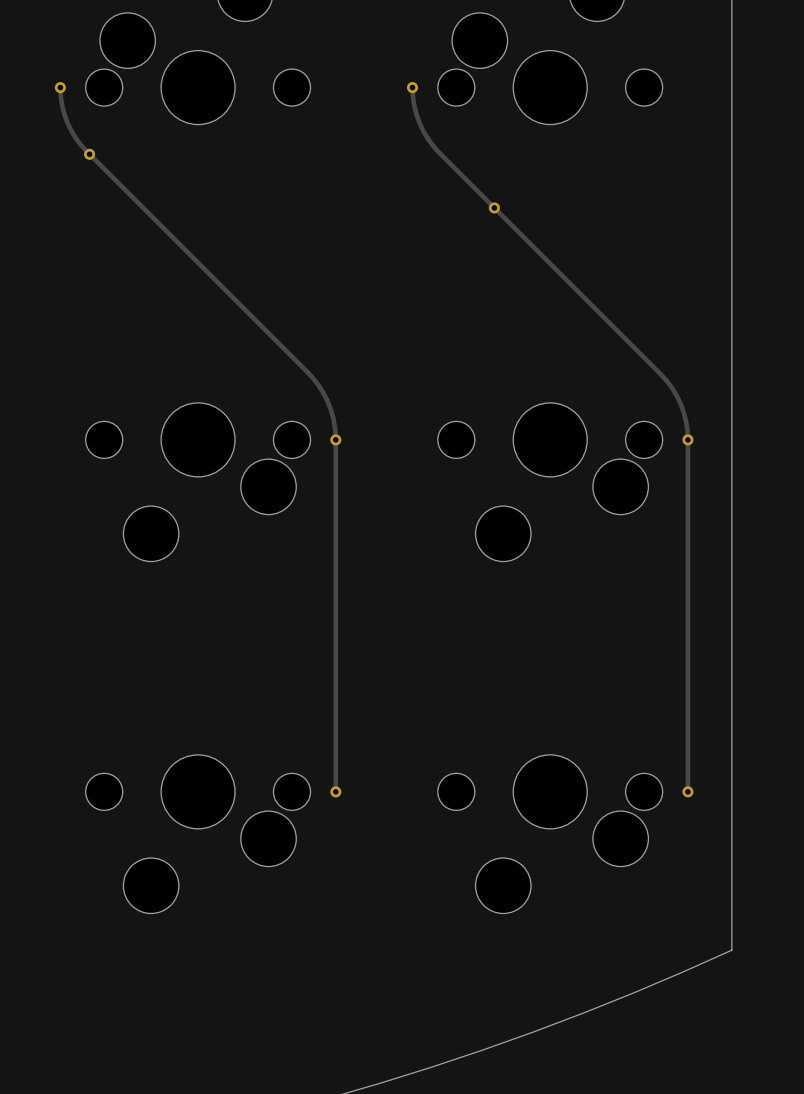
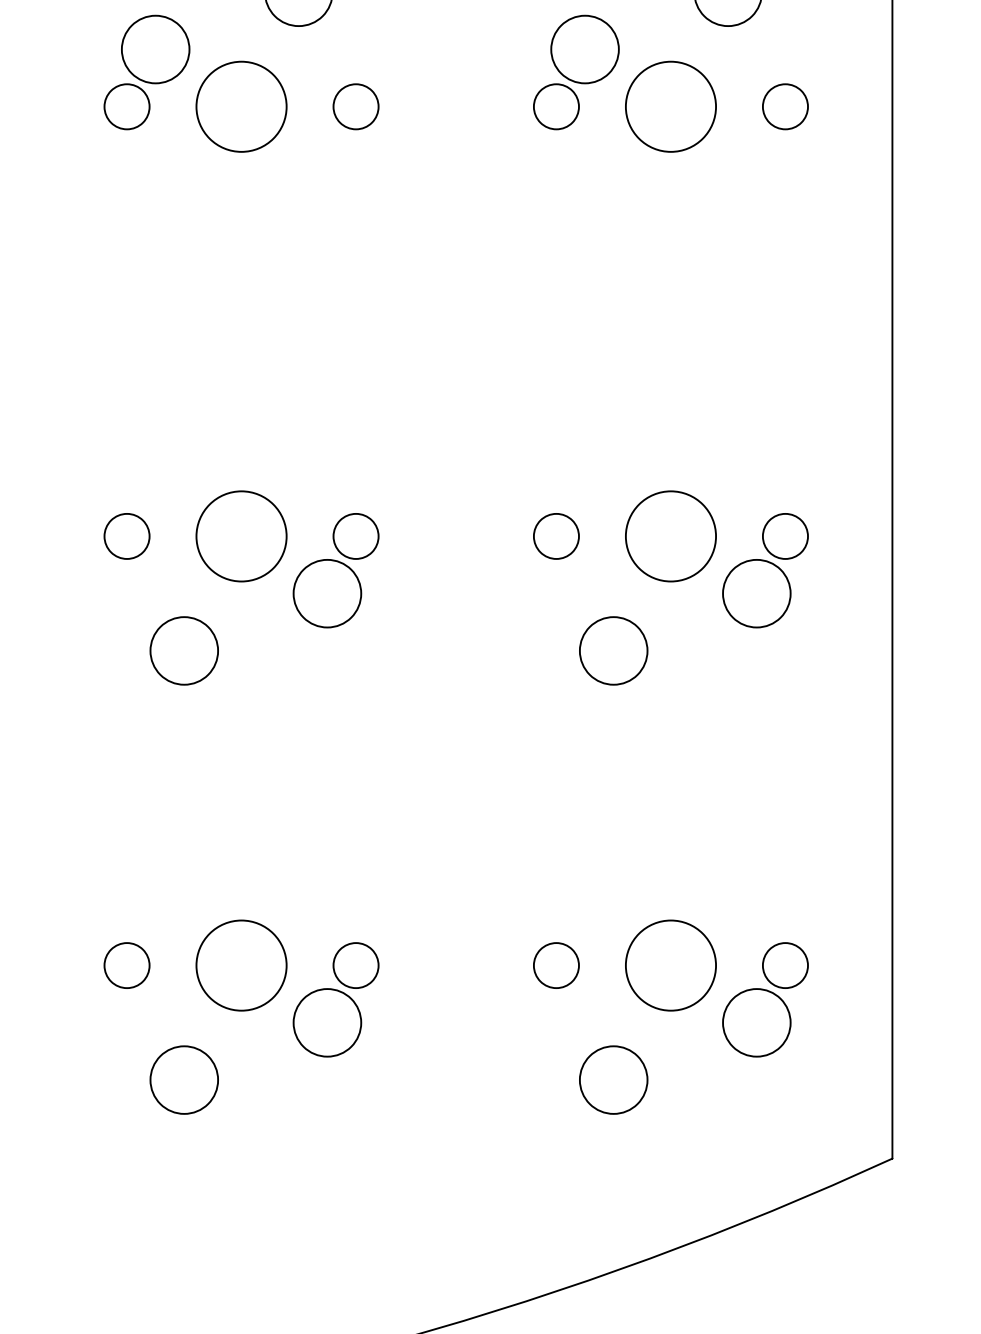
track: (60, 87) (62, 105) (67, 122) (80, 145) (307, 372) (323, 392) (330, 409) (335, 439) (335, 791) -> none
via: (60, 87) -> none
track: (412, 87) (416, 114) (423, 131) (433, 146) (660, 374) (672, 388) (680, 404) (686, 421) (687, 439) (687, 791) -> none
via: (412, 87) -> none
via: (89, 154) -> none
via: (494, 207) -> none
via: (335, 439) -> none
via: (687, 439) -> none
via: (335, 791) -> none
via: (687, 791) -> none

